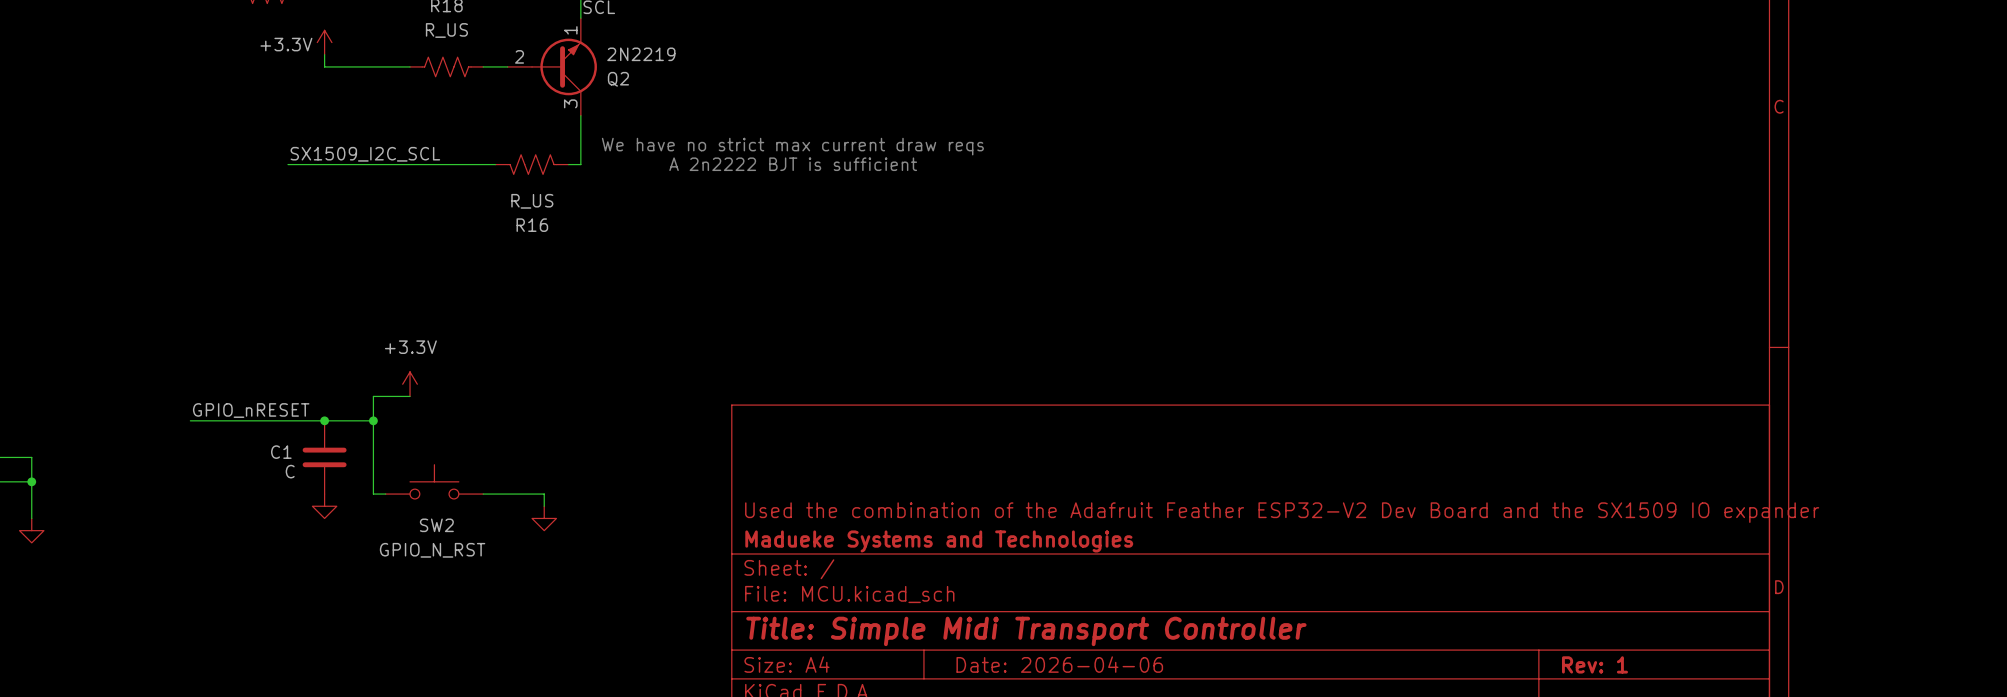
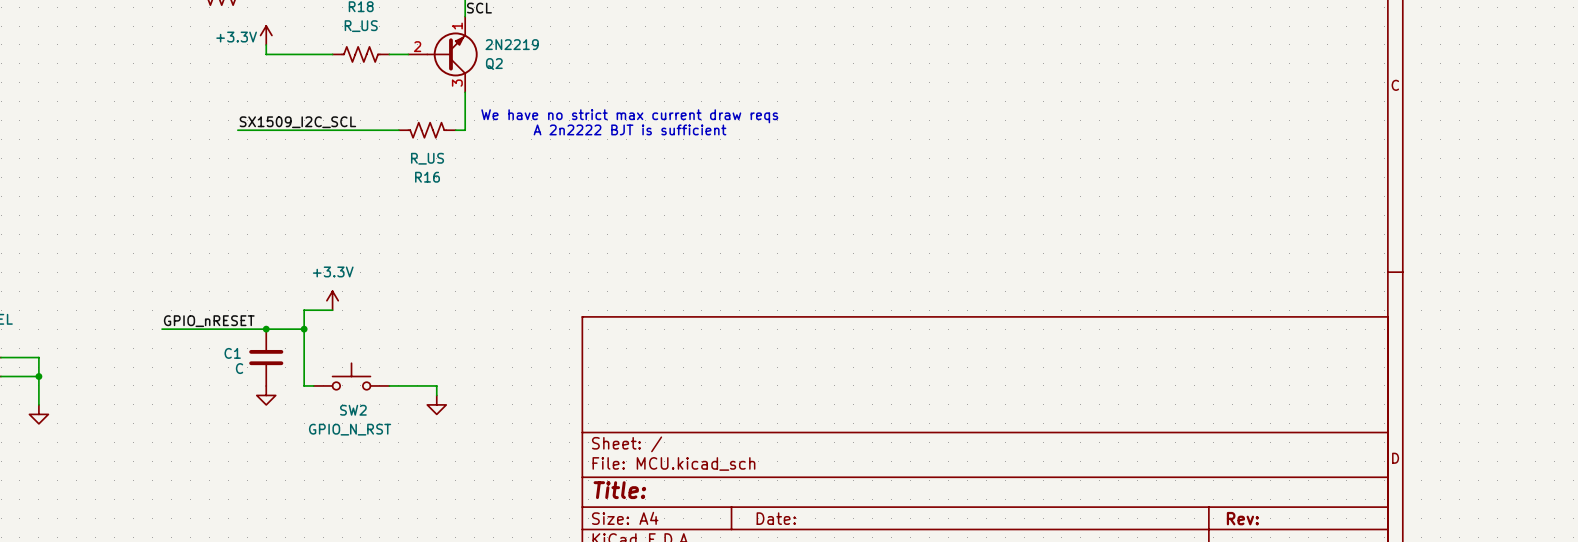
title block: Used the combination of the Adafruit Feather ESP32-V2 Dev Board and the SX1509 IO expander (1282, 512) -> none
title block: Madueke Systems and Technologies (939, 541) -> none
title block: Title: Simple Midi Transport Controller (1026, 631) -> Title: (619, 490)
title block: Date: 2026-04-06 (1059, 664) -> Date: (776, 518)
title block: Rev: 1 (1594, 664) -> Rev: (1242, 518)

